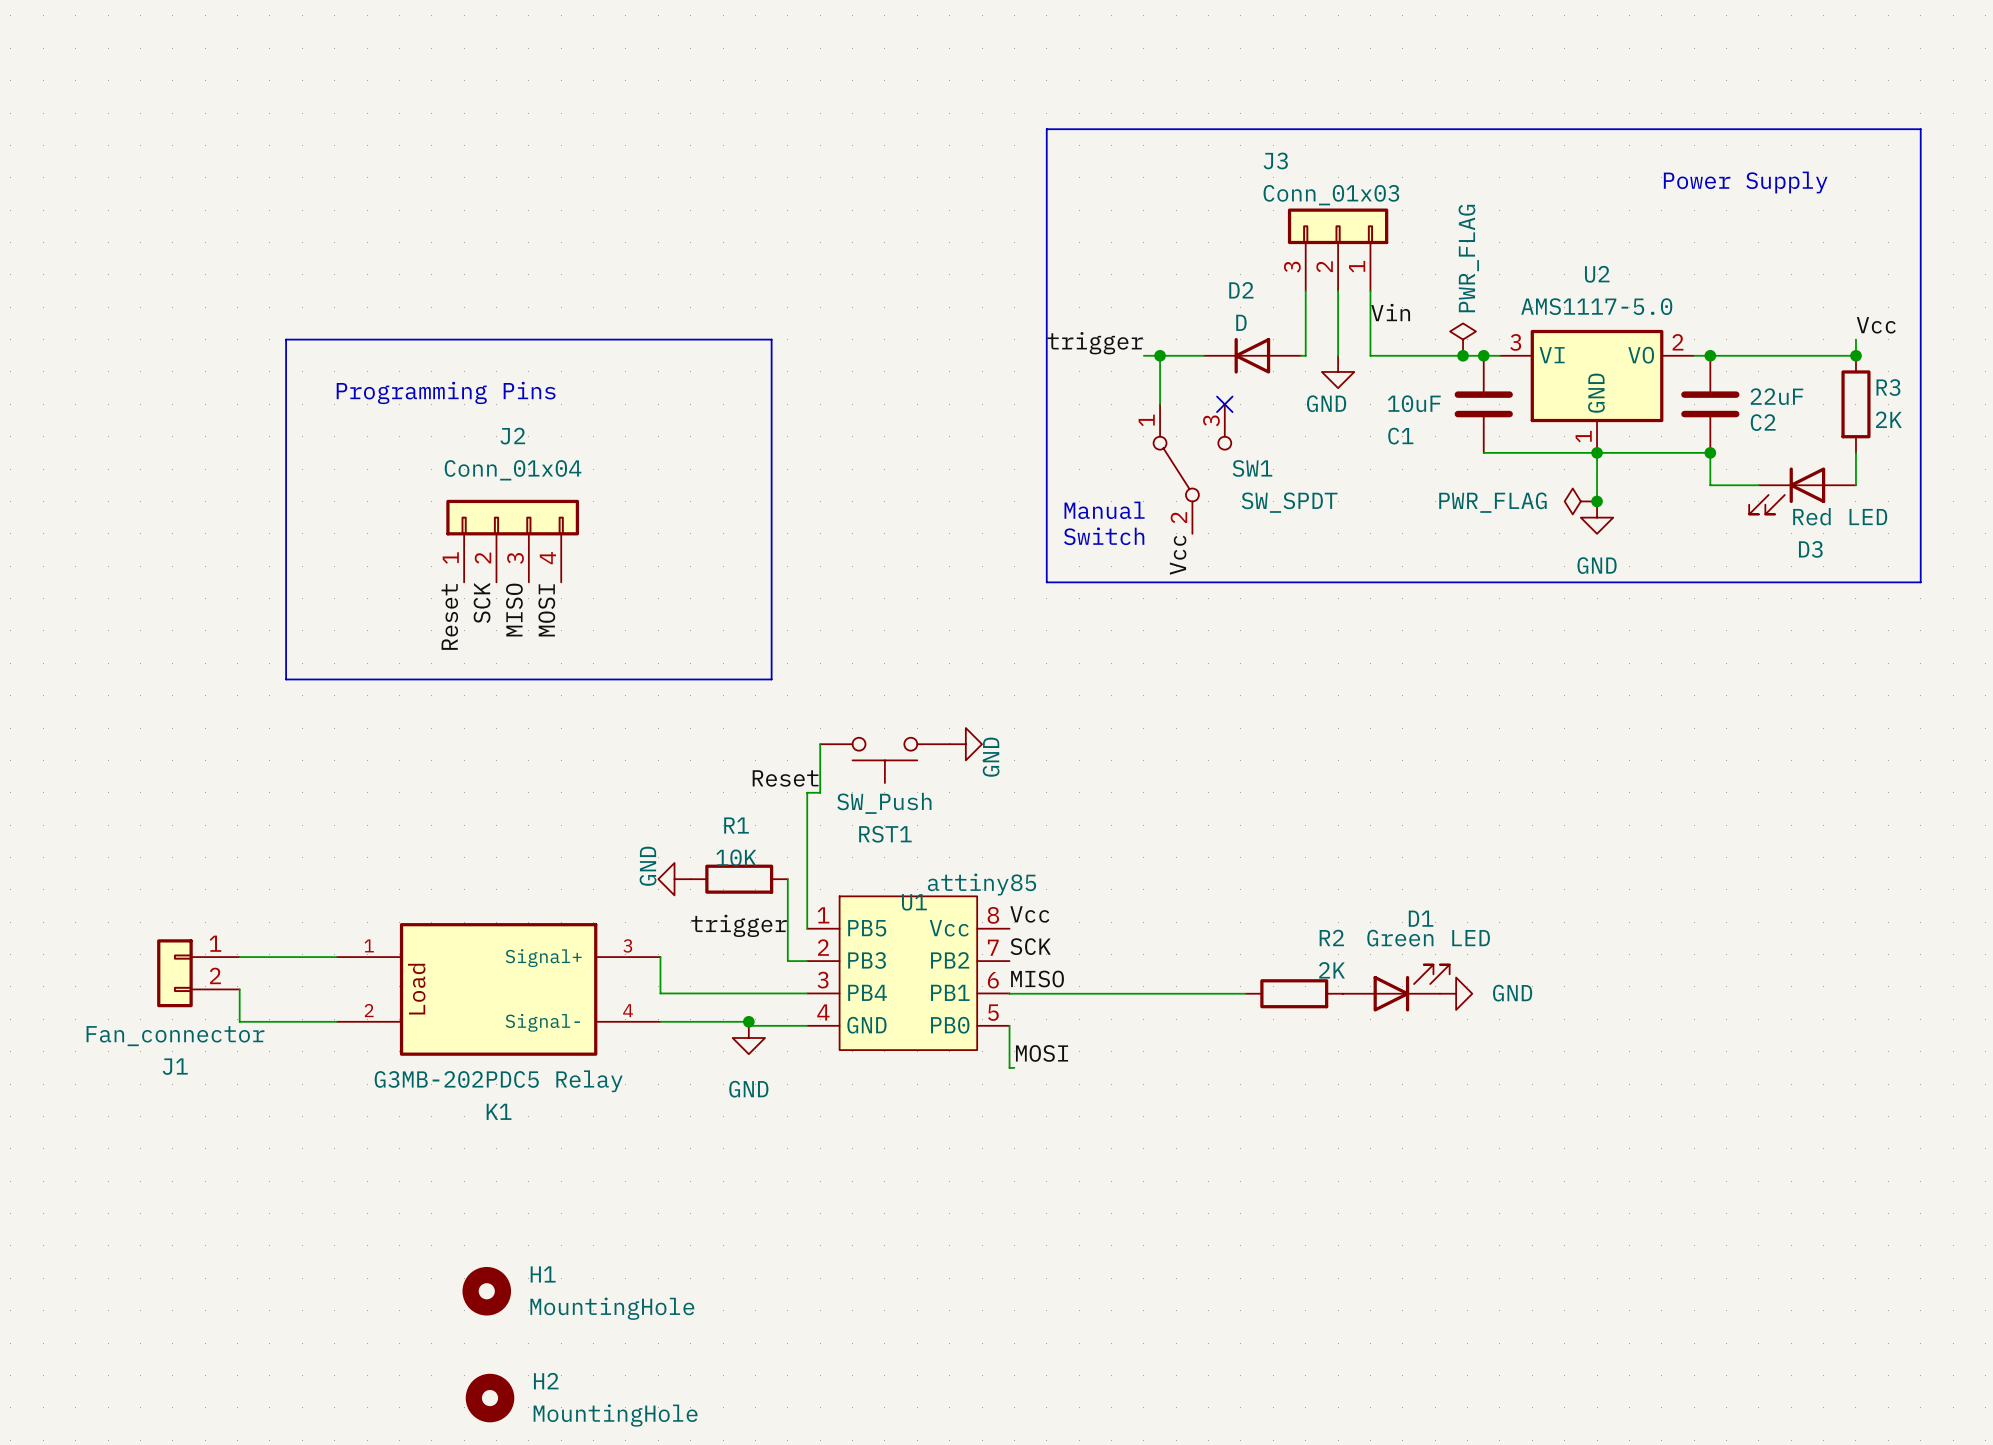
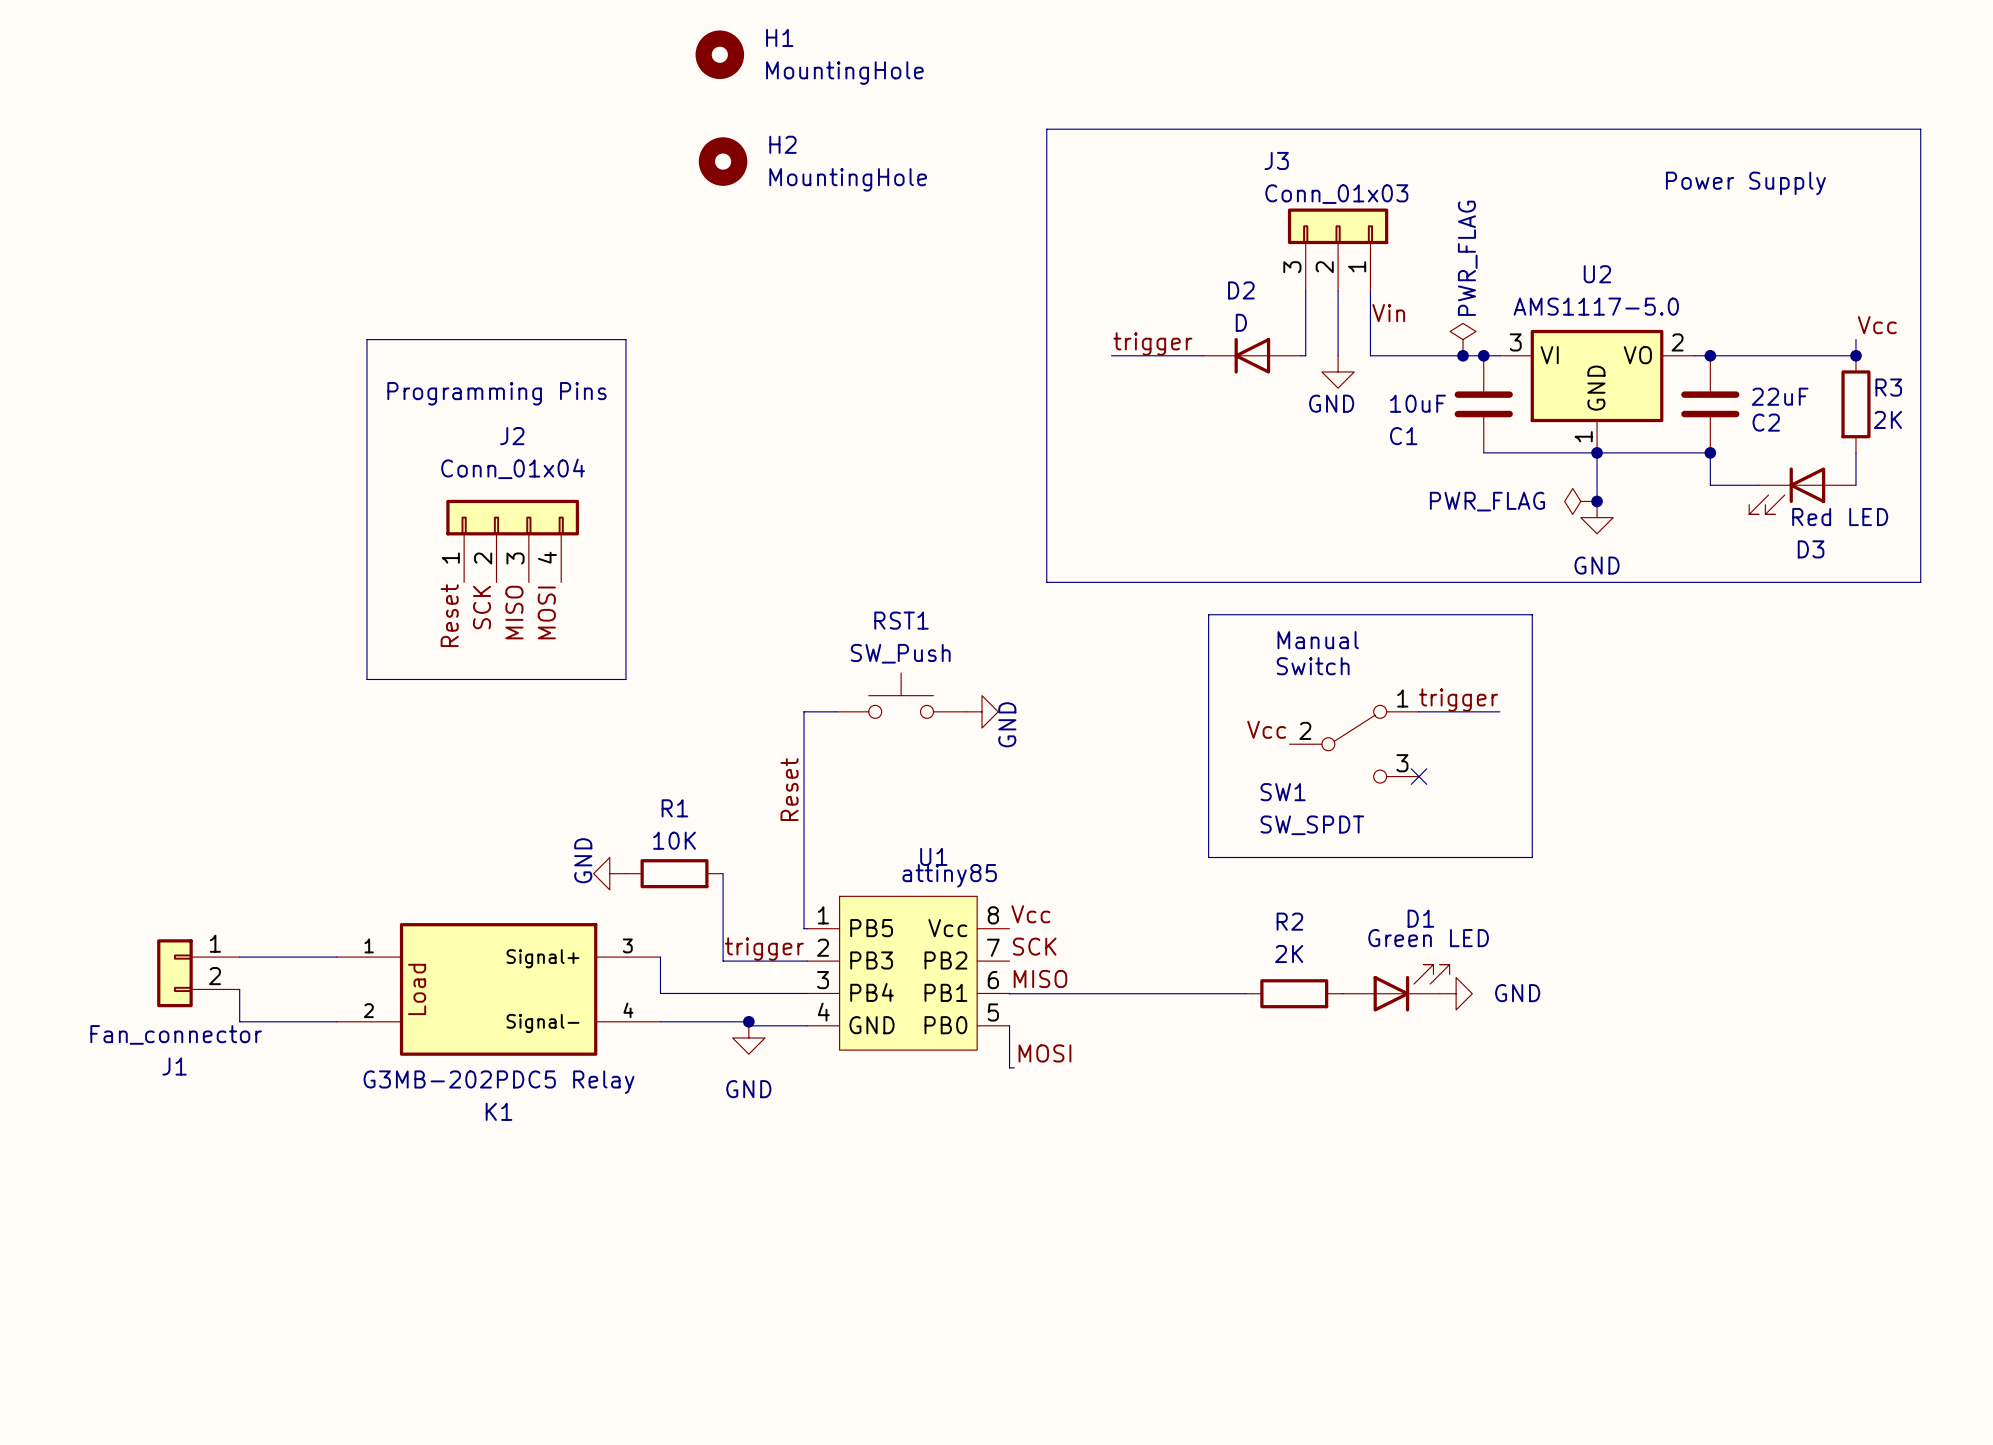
line: (367, 339) (286, 339) (286, 679) (367, 679) -> (367, 339) (367, 679)
line: (625, 339) (771, 339) (771, 679) (625, 679) -> (625, 339) (625, 679)
label position: trigger (1095, 343) -> trigger (1152, 344)
wire: none -> (1111, 355) (1143, 355)
wire: (1160, 355) (1160, 404) -> none
junction: (1160, 355) -> none
text position: Programming Pins (446, 392) -> Programming Pins (496, 393)
no-connect mark: (1224, 404) -> none
SW1 name position: SW1 (1252, 468) -> SW1 (1283, 792)
SW1 rotation: 0° (1192, 469) -> 90° clockwise (1354, 744)
SW1 position: (1192, 469) -> (1354, 744)
text position: Manual (1104, 510) -> Manual (1318, 640)
text position: Switch (1104, 536) -> Switch (1313, 666)
label rotation: 0° (1178, 555) -> 90° clockwise (1266, 729)
label position: Vcc (1178, 555) -> Vcc (1266, 729)
line: none -> (1208, 614) (1532, 614) (1532, 857) (1208, 857) (1208, 614)
label: none -> trigger (1458, 700)
wire: none -> (1419, 711) (1499, 711)
wire: (820, 744) (820, 792) (807, 792) (807, 928) -> (836, 711) (803, 711) (803, 928) (807, 928)
power symbol position: GND (965, 744) -> GND (982, 711)
RST1 rotation: 0° (884, 760) -> 180° (901, 695)
no-connect mark: none -> (1419, 776)
label rotation: 0° (785, 778) -> 90° counterclockwise (789, 789)
R1 name position: R1 (736, 825) -> R1 (674, 808)
R1 value position: 10K (736, 857) -> 10K (674, 840)
power symbol position: GND (674, 879) -> GND (609, 873)
R1 position: (739, 879) -> (674, 873)
wire: (787, 879) (787, 961) -> (723, 873) (723, 961) (787, 961)
U1 value position: attiny85 (982, 884) -> attiny85 (949, 875)
U1 name position: U1 (914, 902) -> U1 (933, 856)
label position: trigger (739, 925) -> trigger (764, 949)
R2 name position: R2 (1331, 937) -> R2 (1289, 921)
R2 value position: 2K (1331, 970) -> 2K (1289, 954)
H1 position: (486, 1291) -> (719, 54)
H2 position: (490, 1398) -> (723, 161)

